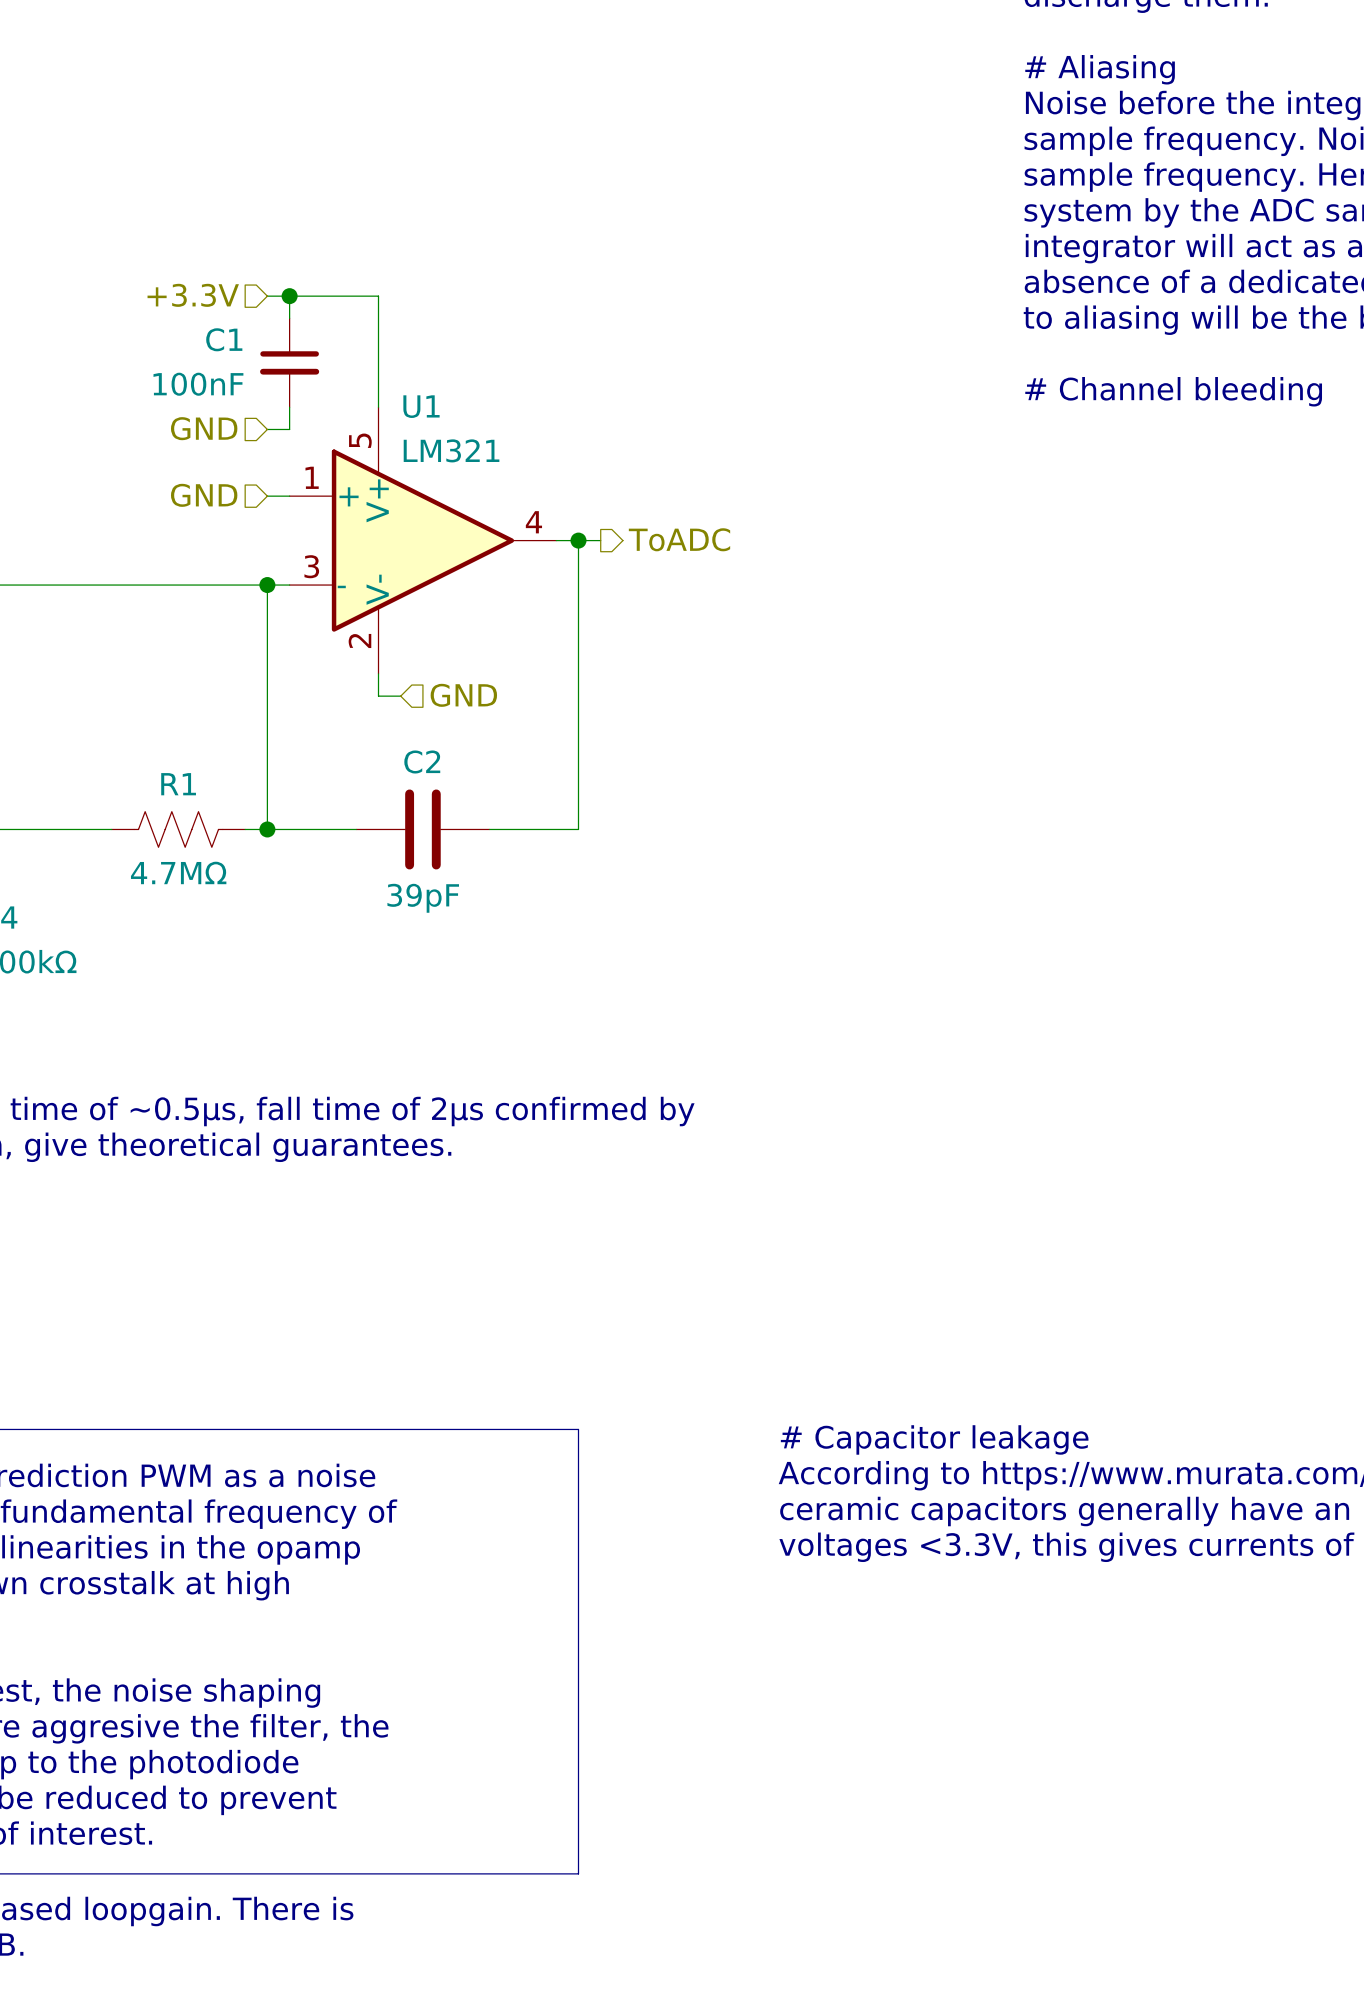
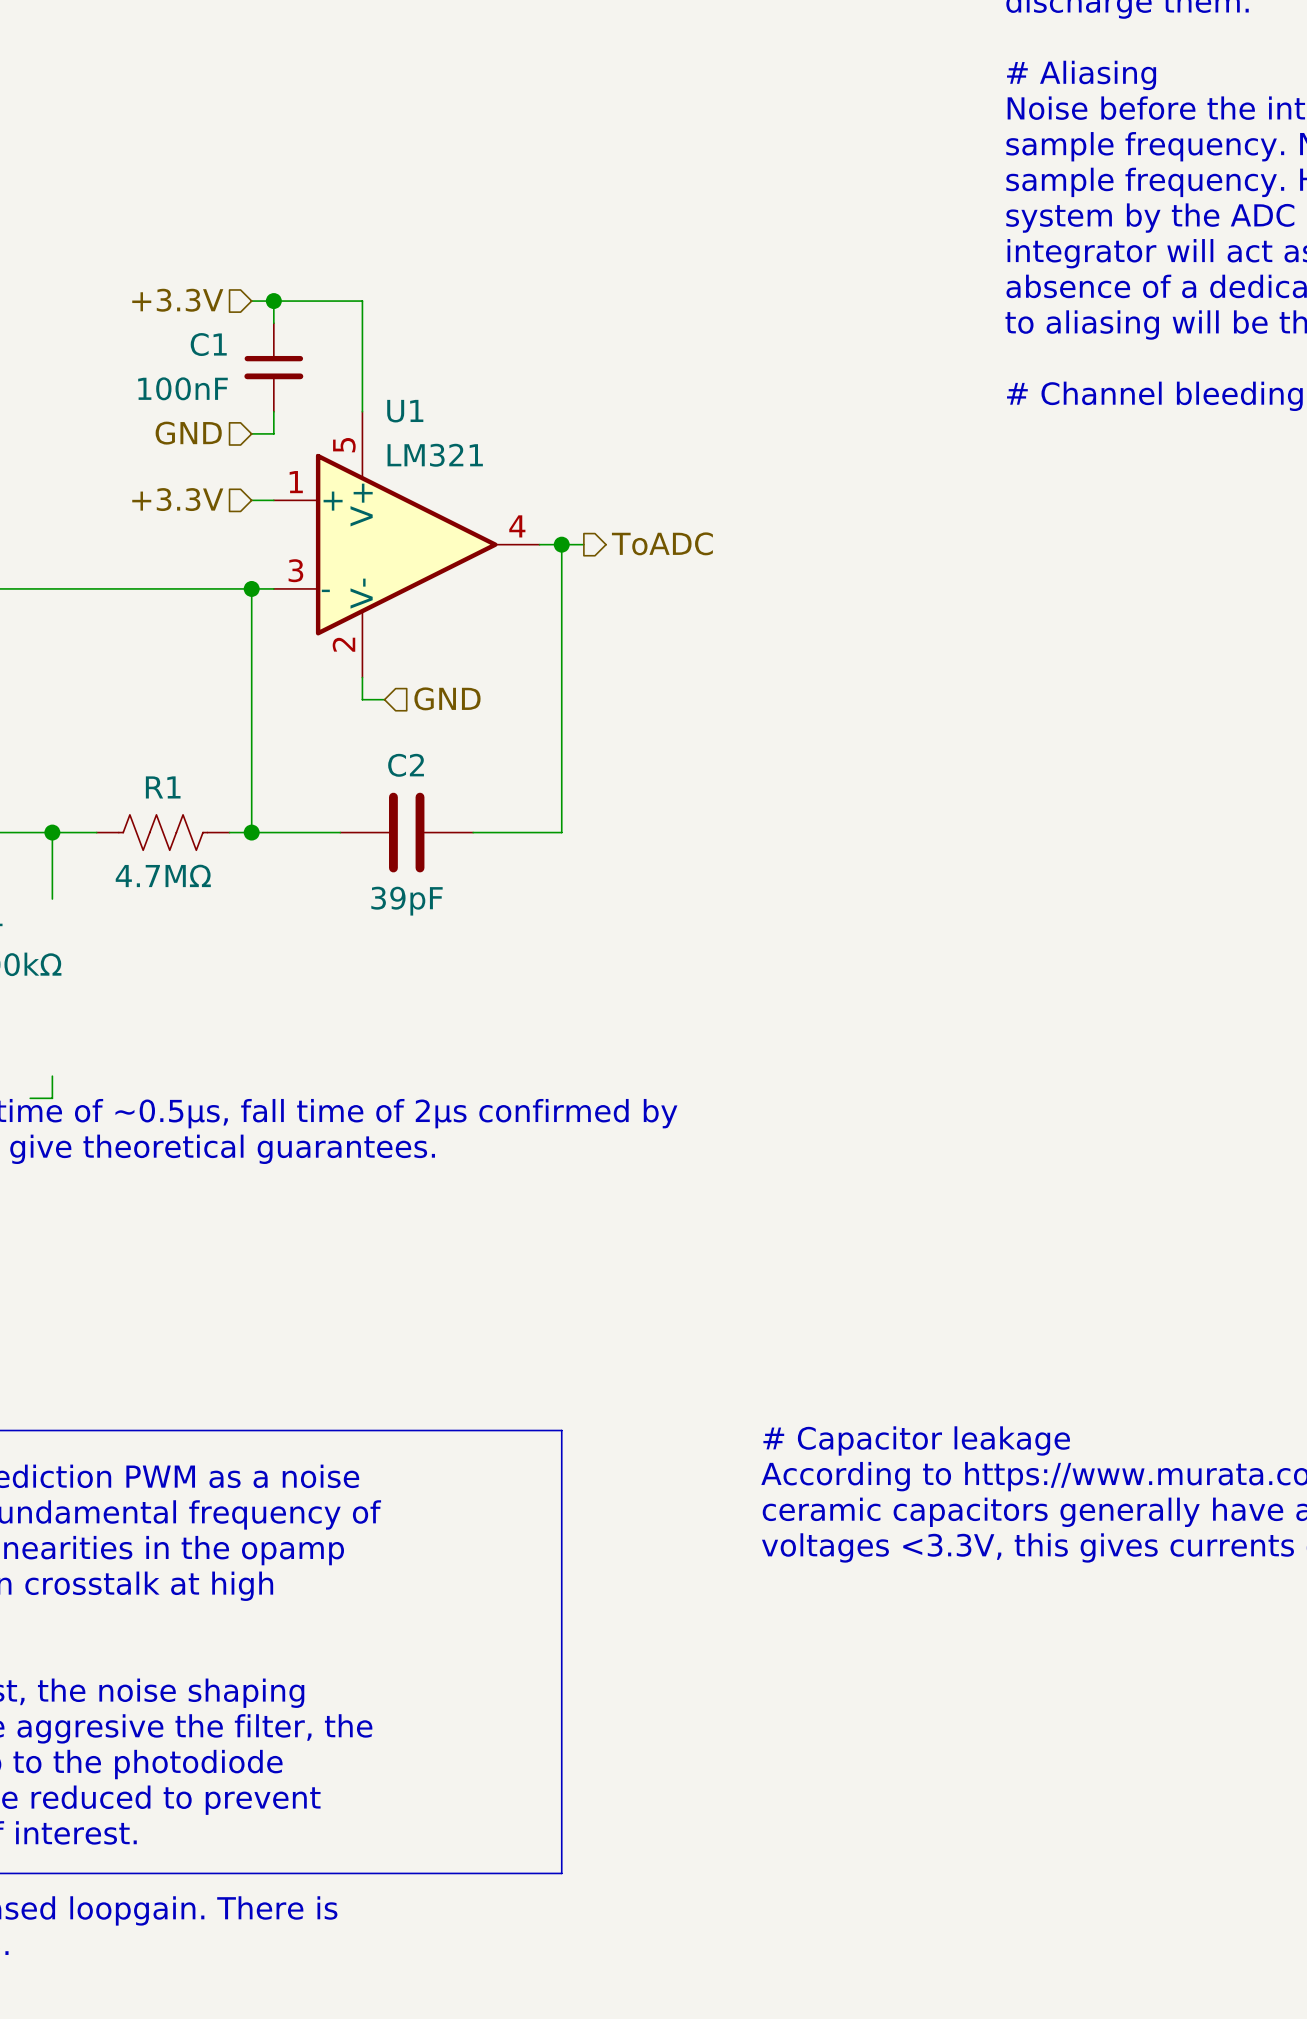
hierarchical label: GND (204, 495) -> +3.3V (177, 499)
wire: none -> (52, 832) (52, 899)
junction: none -> (52, 832)
wire: none -> (52, 1076) (52, 1098) (30, 1098)

